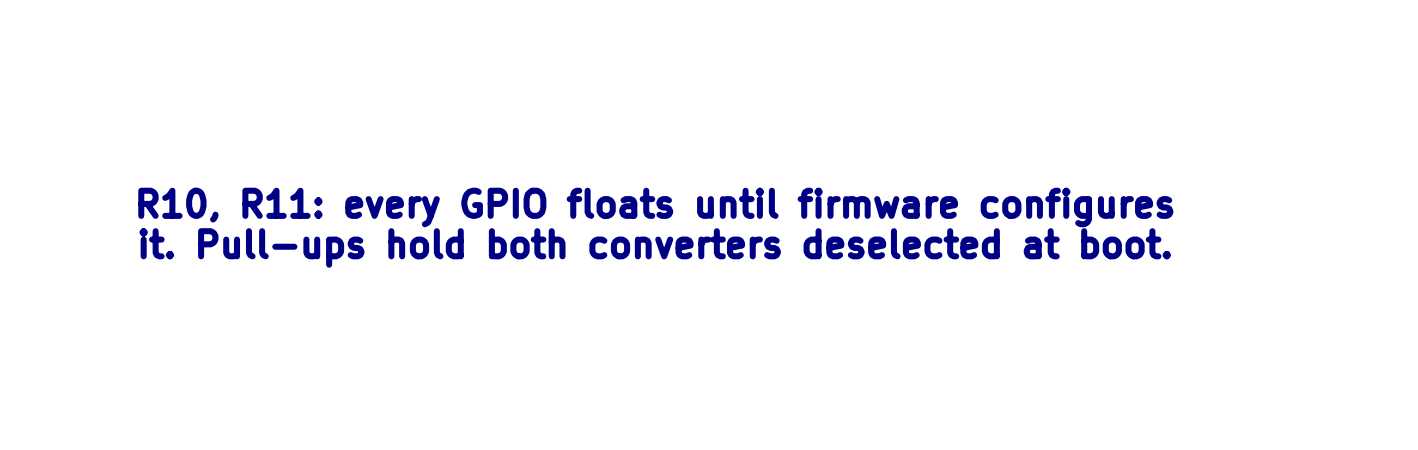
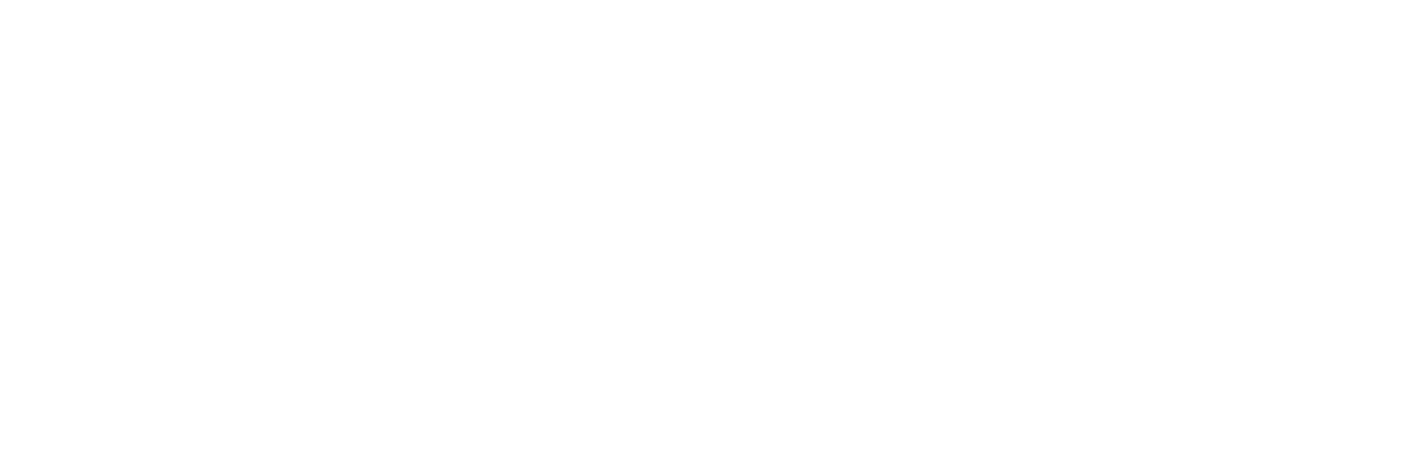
text: R10, R11: every GPIO floats until firmware configures (655, 207) -> none
text: it. Pull-ups hold both converters deselected at boot. (655, 247) -> none

